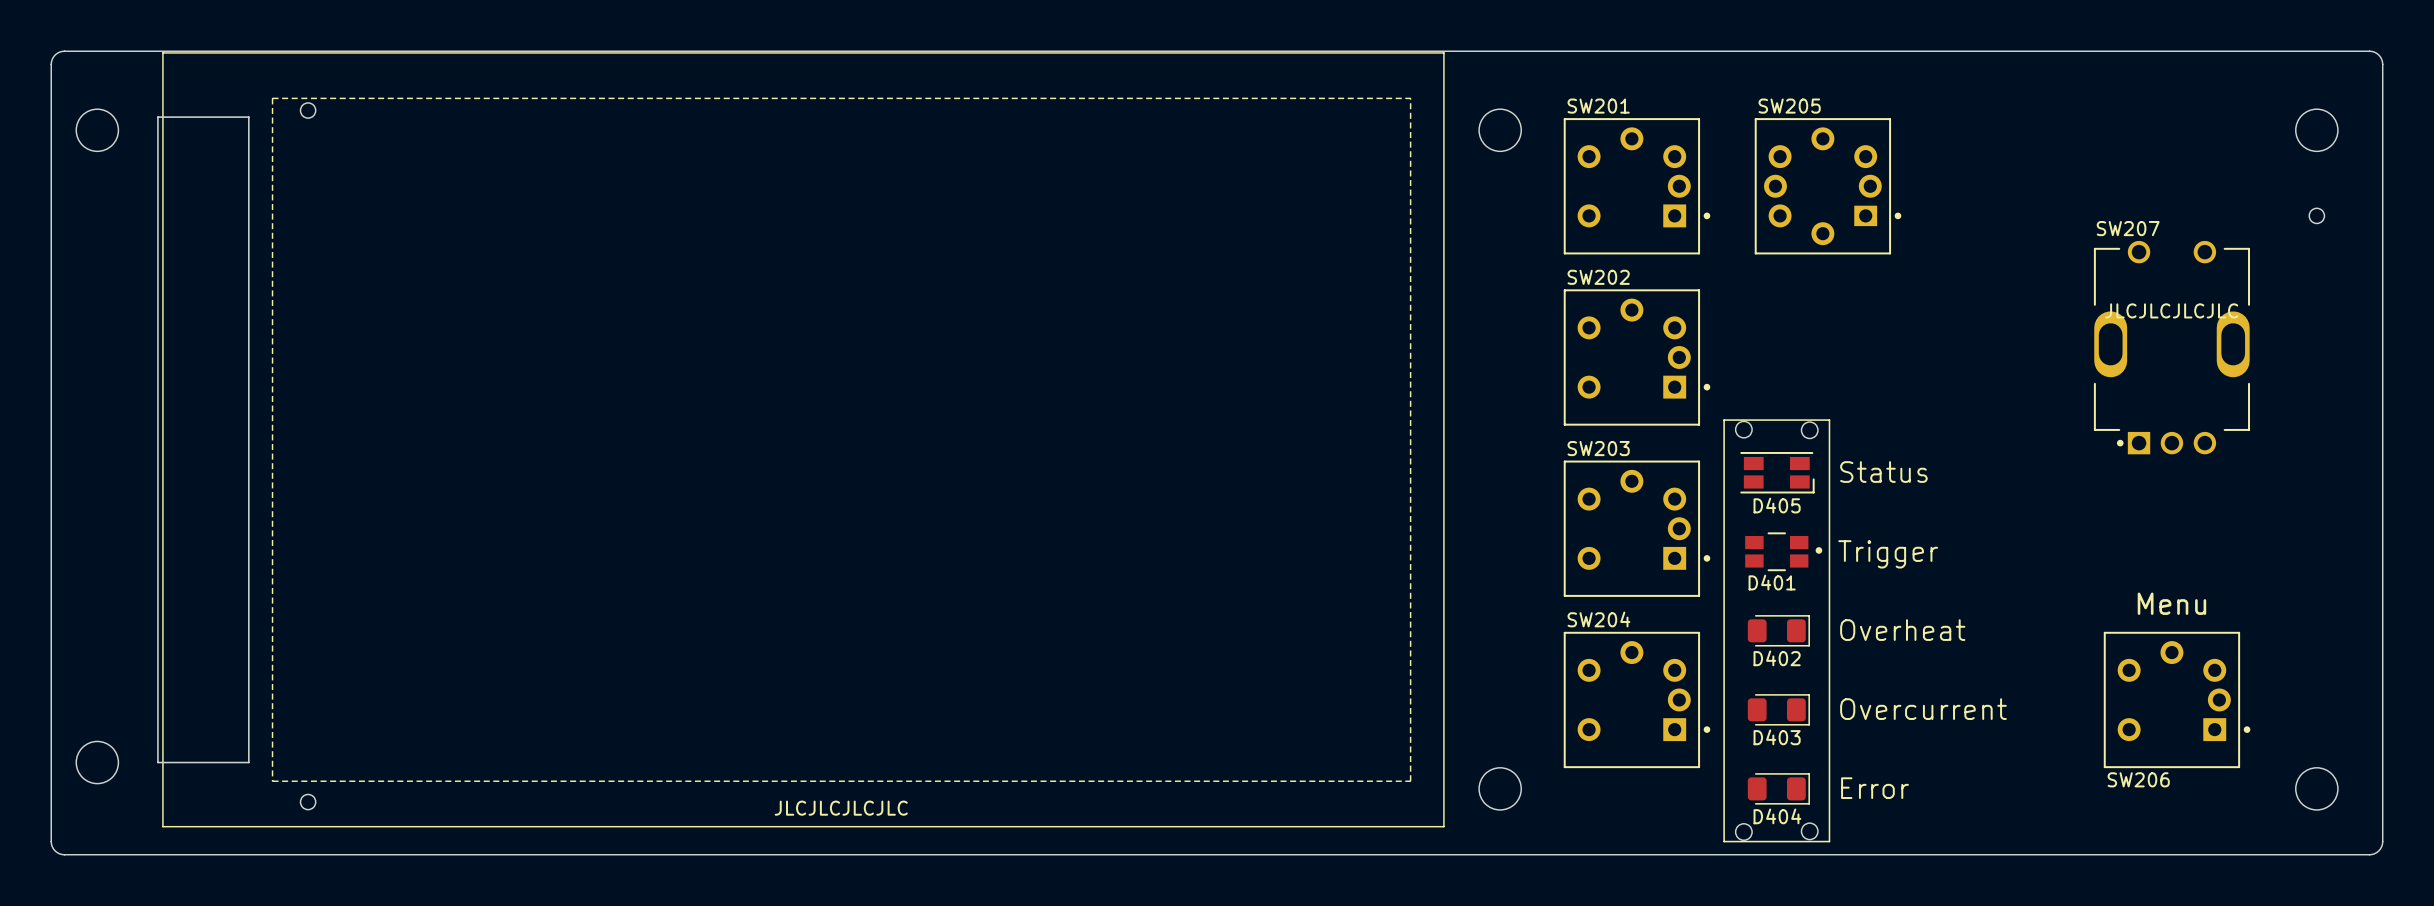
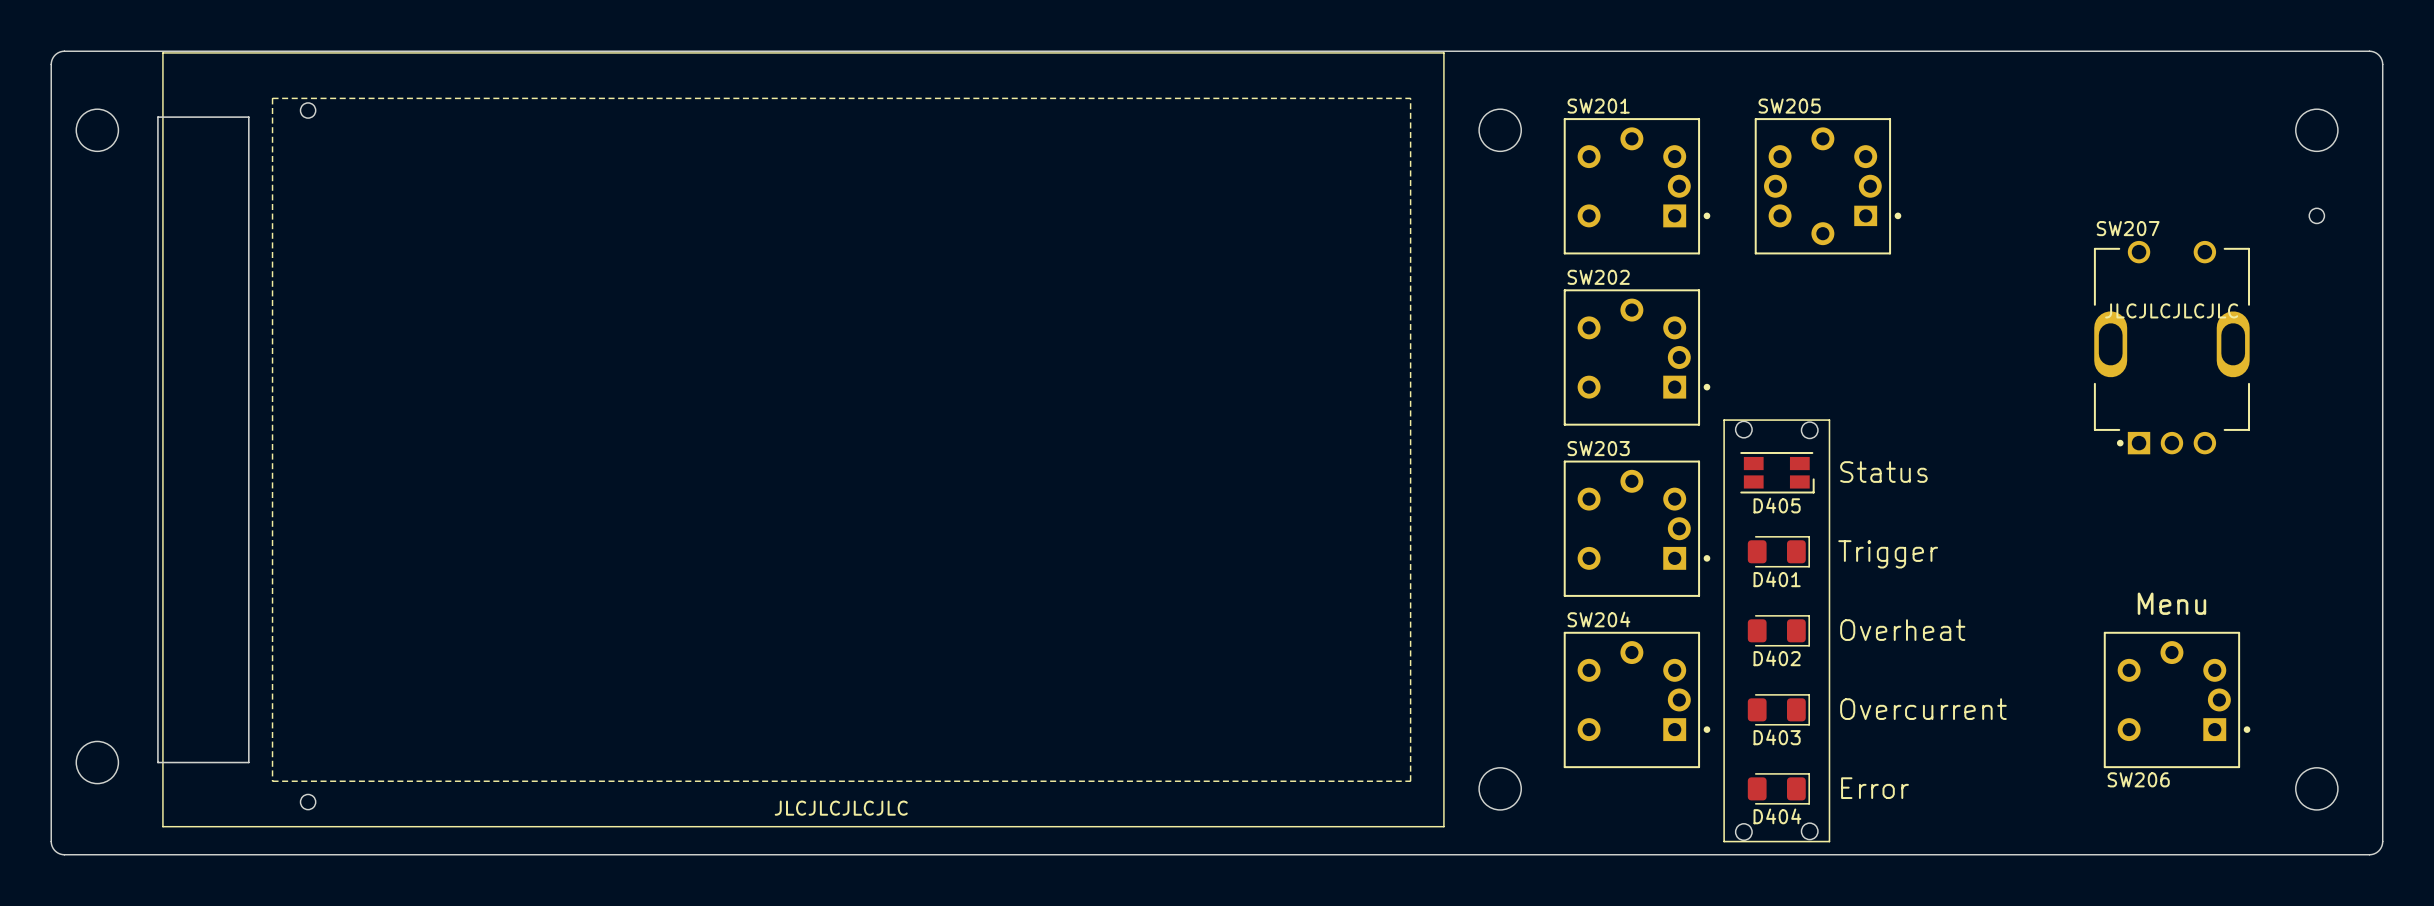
D401 footprint: [1745, 532, 1823, 572] -> [1747, 536, 1810, 568]

